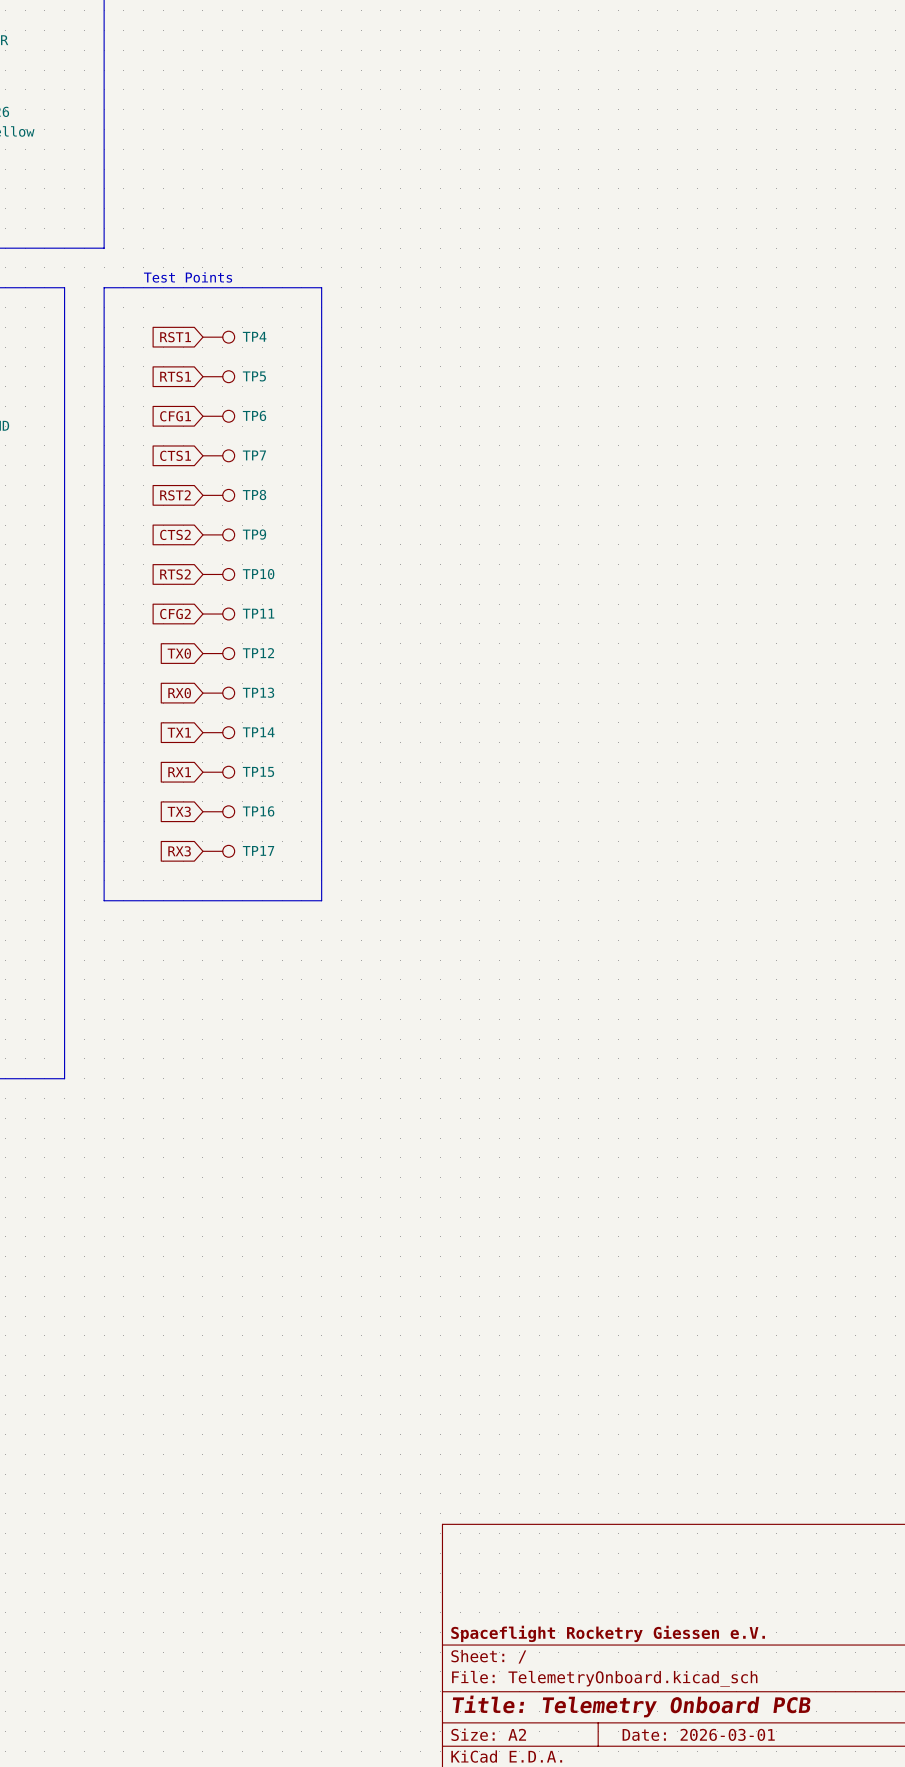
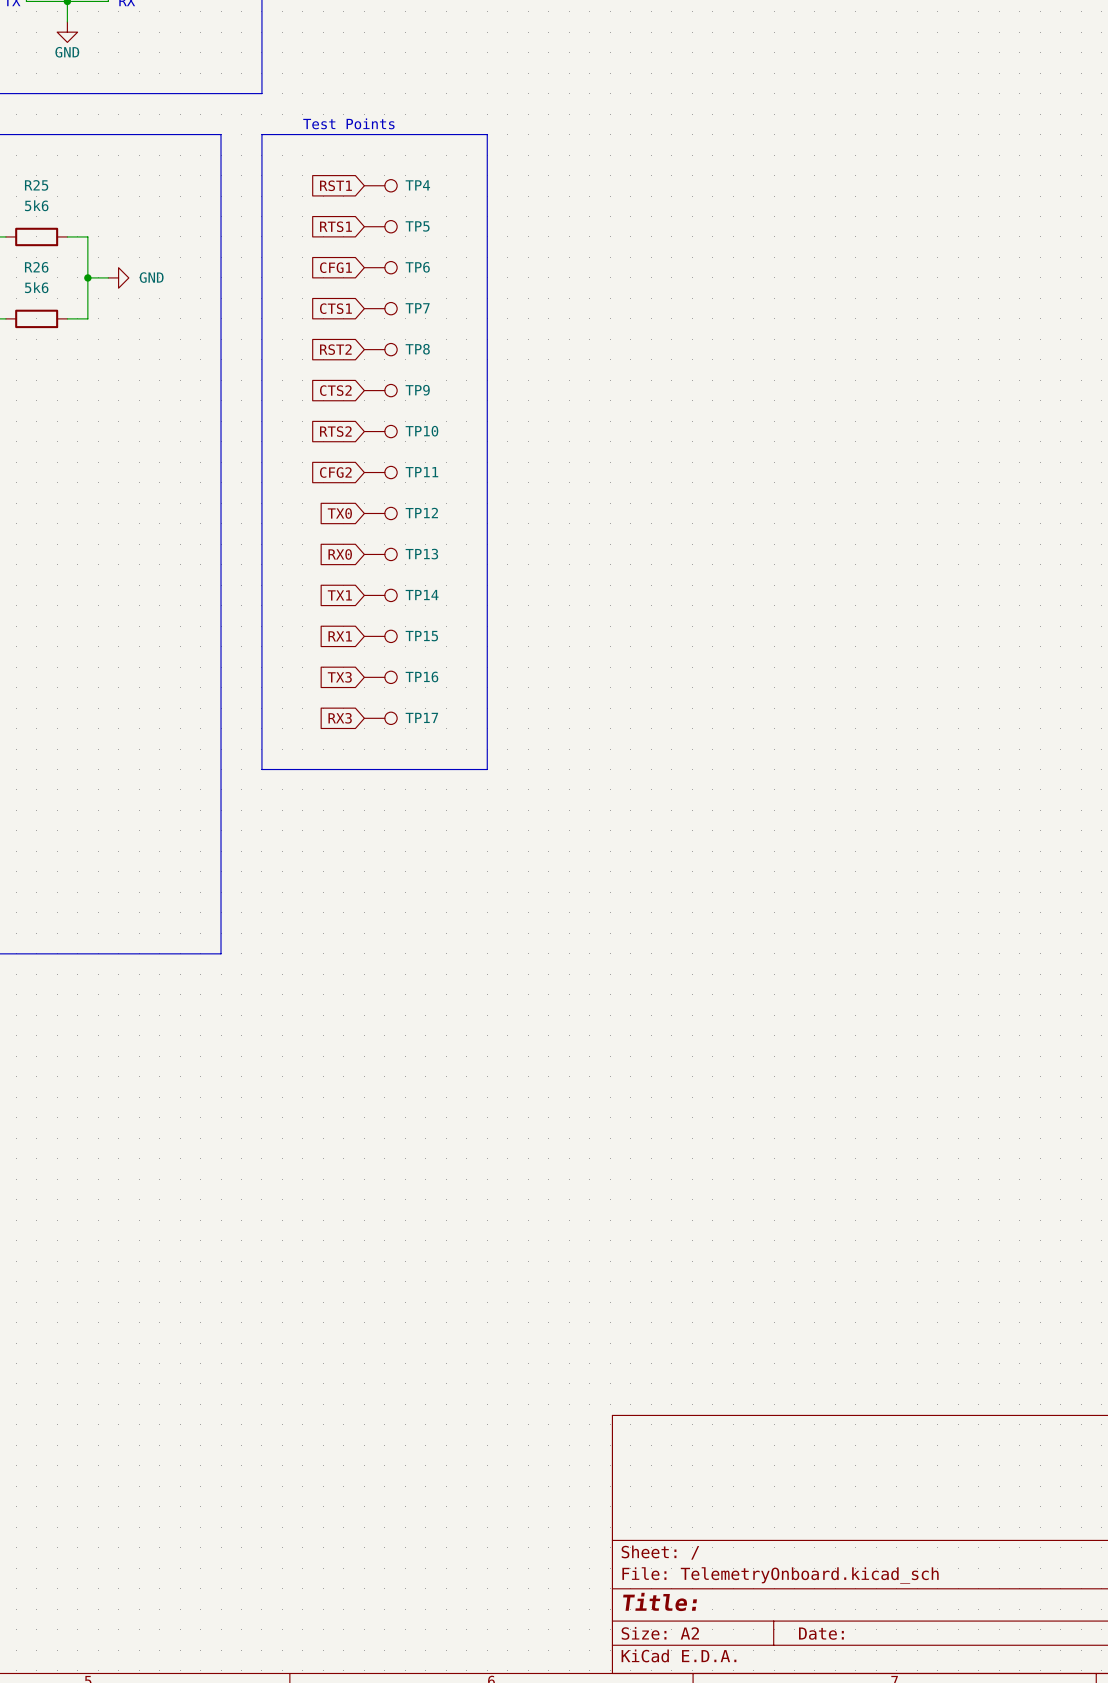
title block: Spaceflight Rocketry Giessen e.V. (608, 1633) -> none
title block: Title: Telemetry Onboard PCB (631, 1706) -> Title: (660, 1601)
title block: Date: 2026-03-01 (698, 1734) -> Date: (821, 1633)

